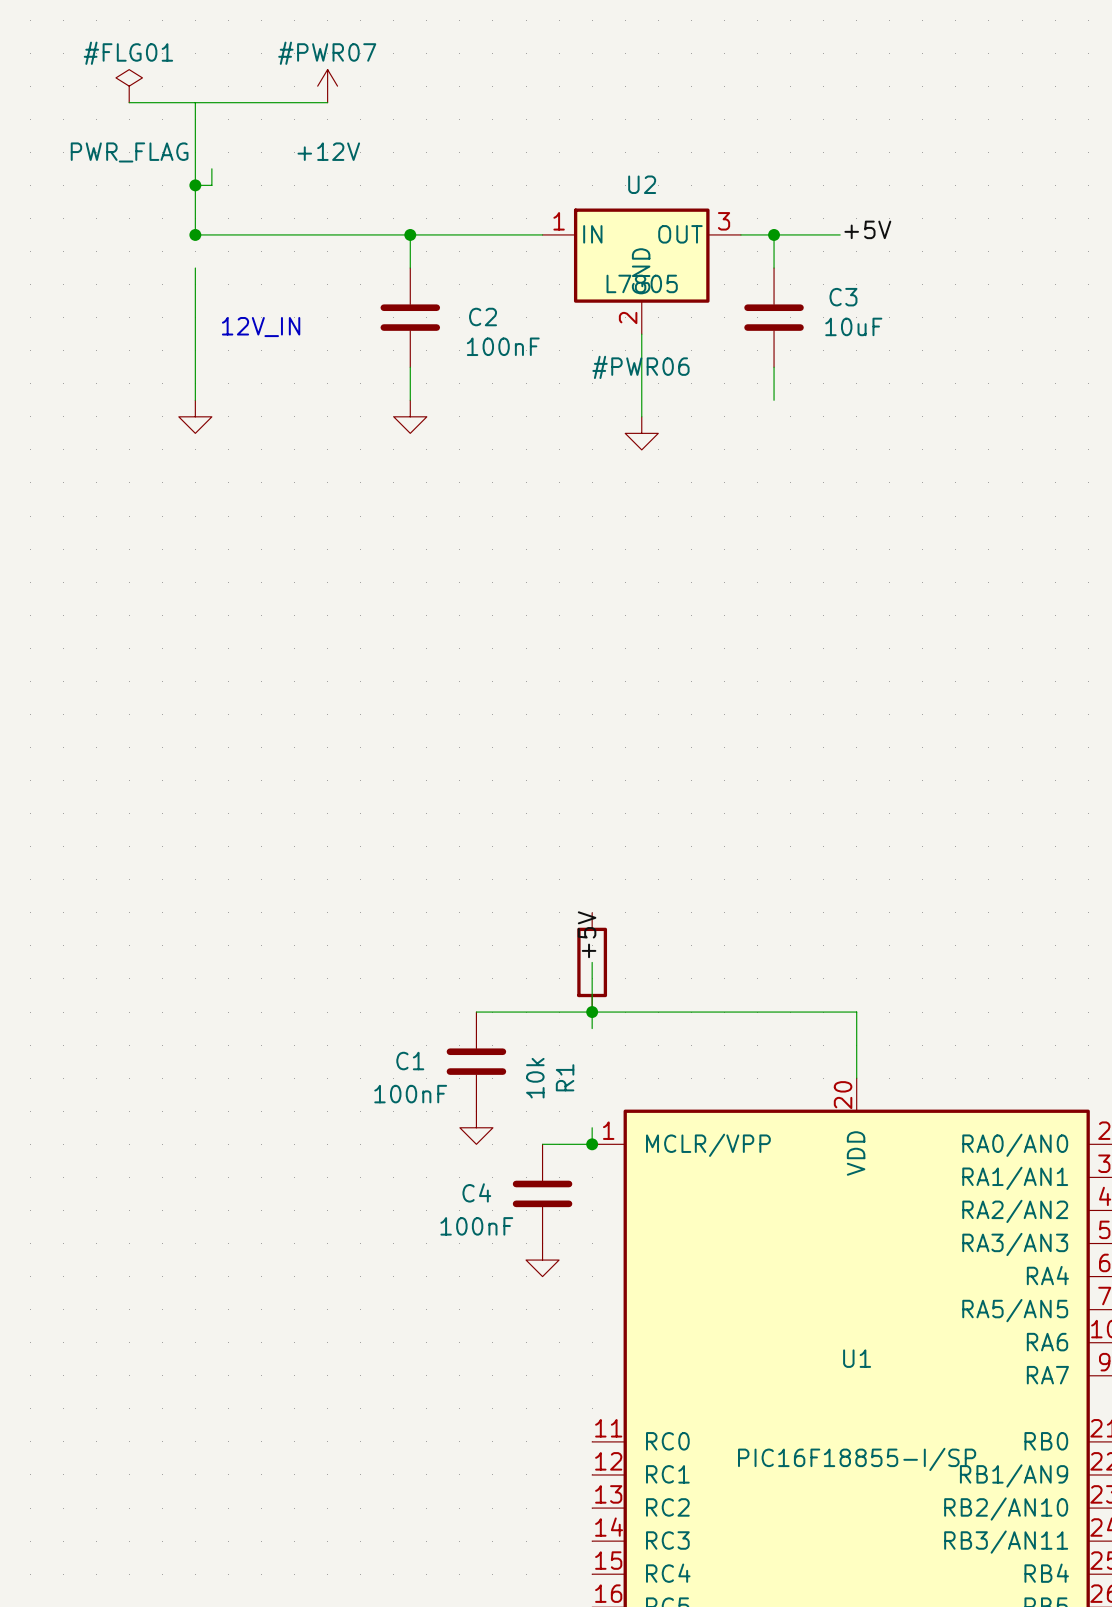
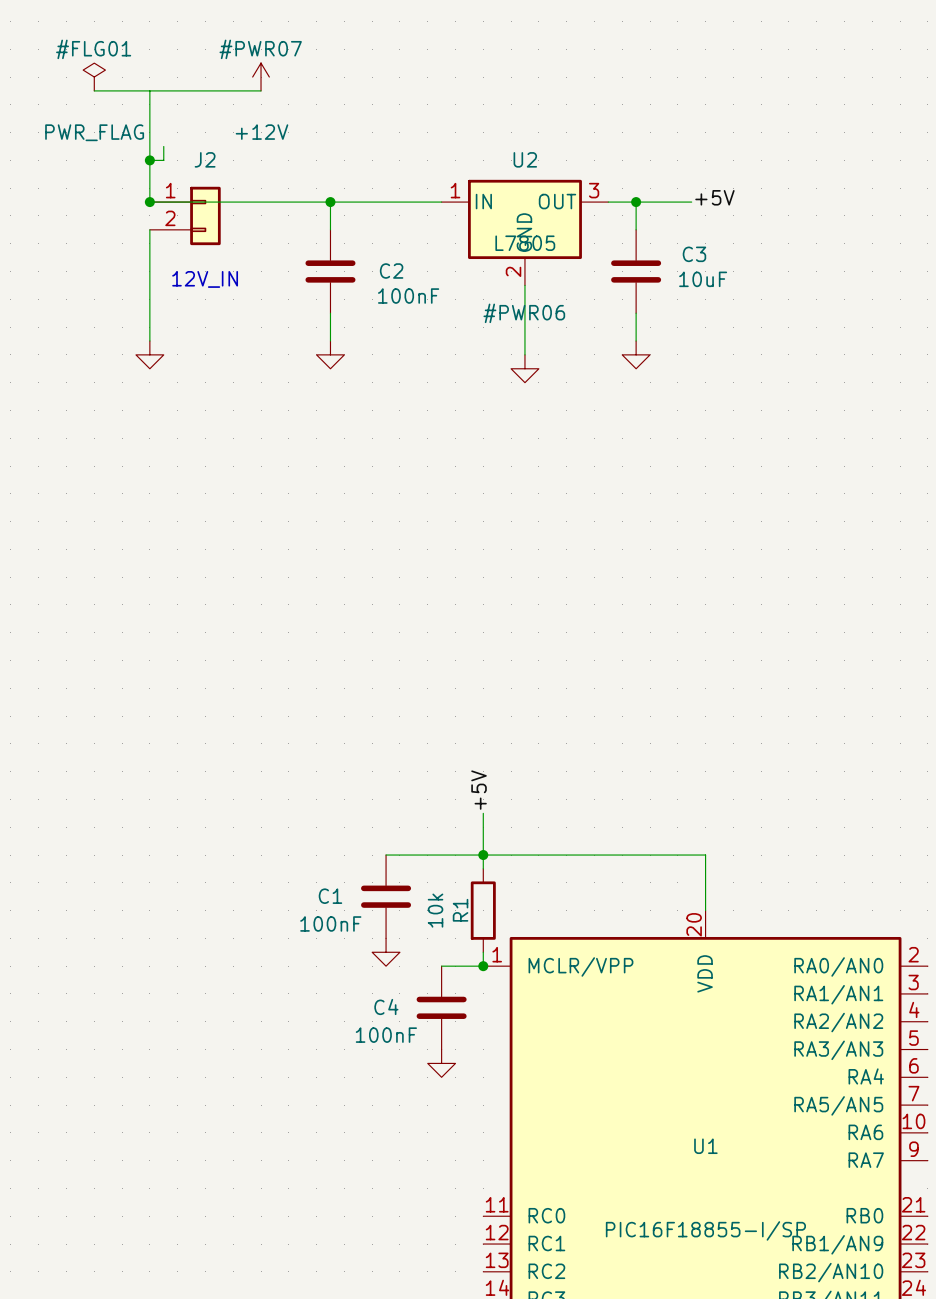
J2: none -> (185, 215)
power symbol: none -> (636, 354)
R1 position: (592, 962) -> (483, 910)

